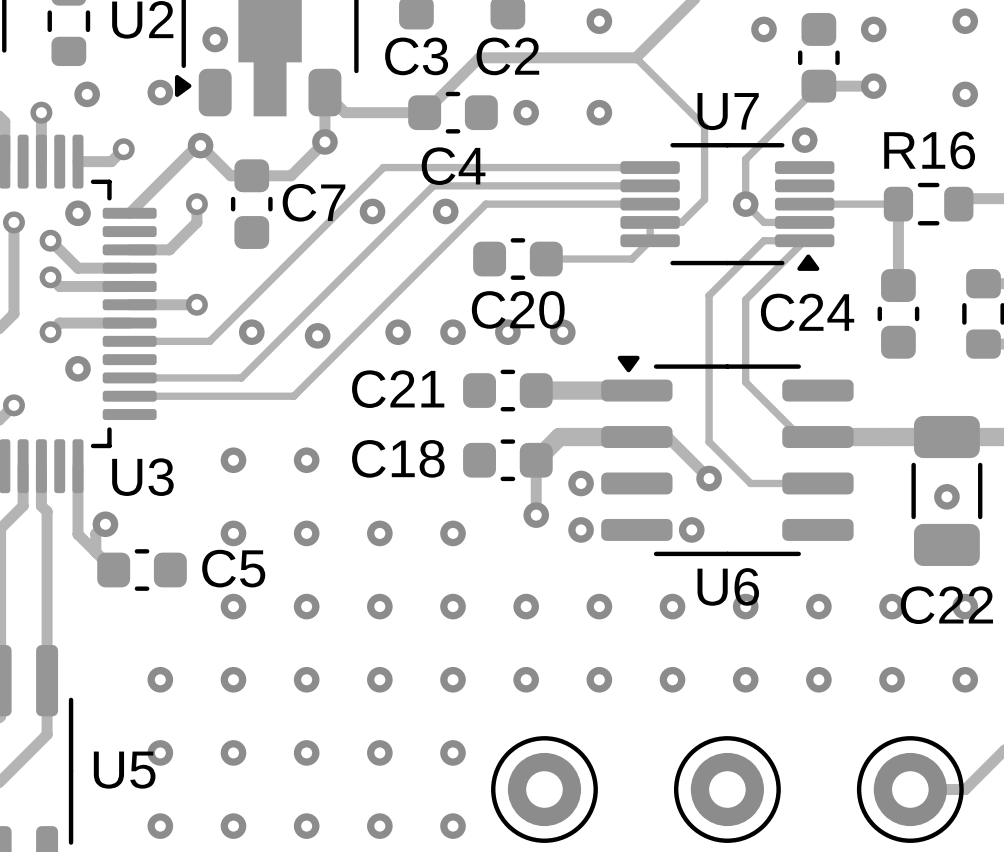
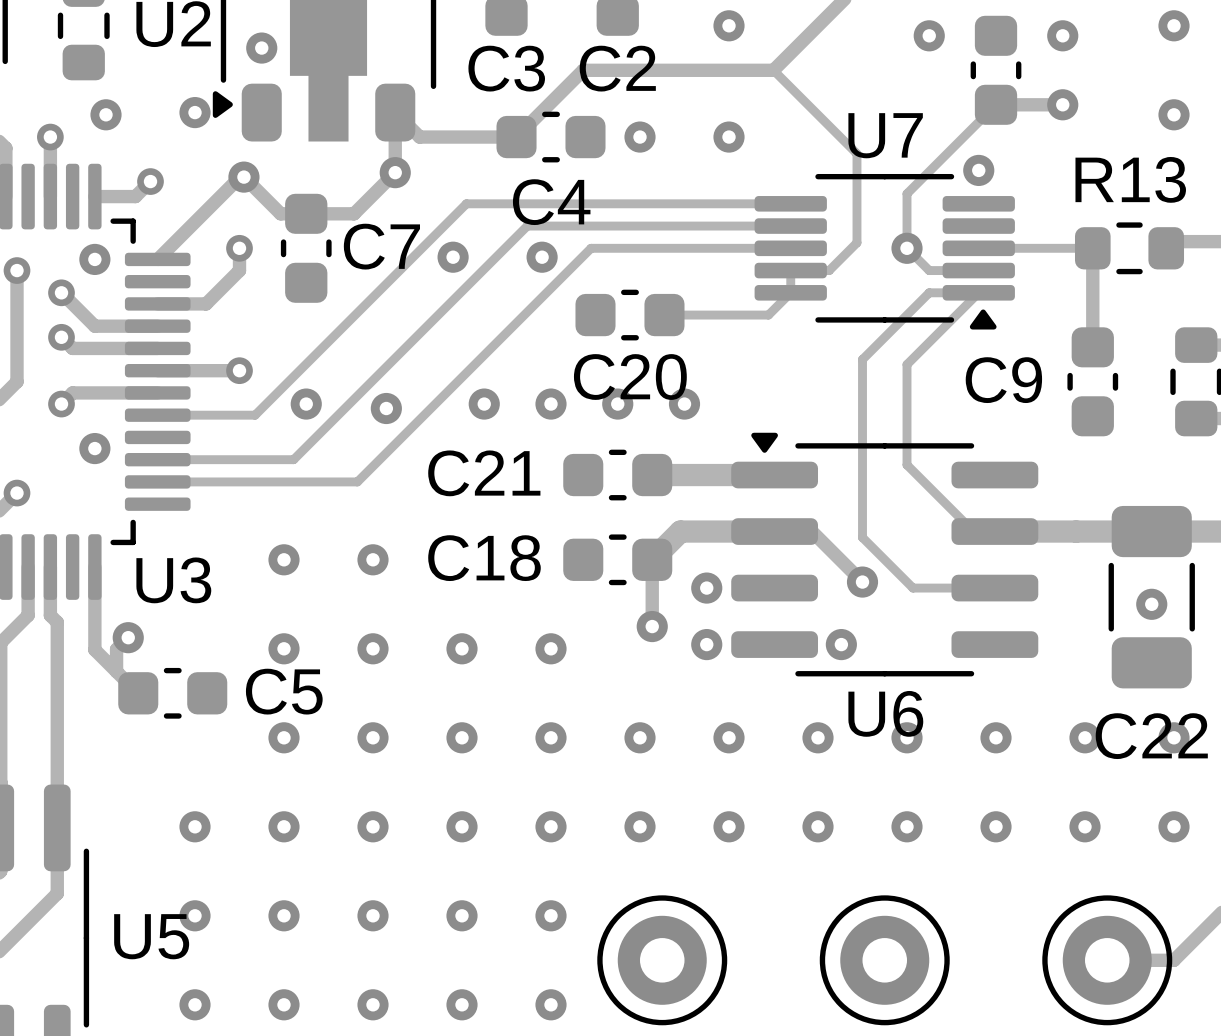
R16 name: R16 (929, 150) -> R13 (1130, 179)
C24 name: C24 (807, 312) -> C9 (1003, 380)

